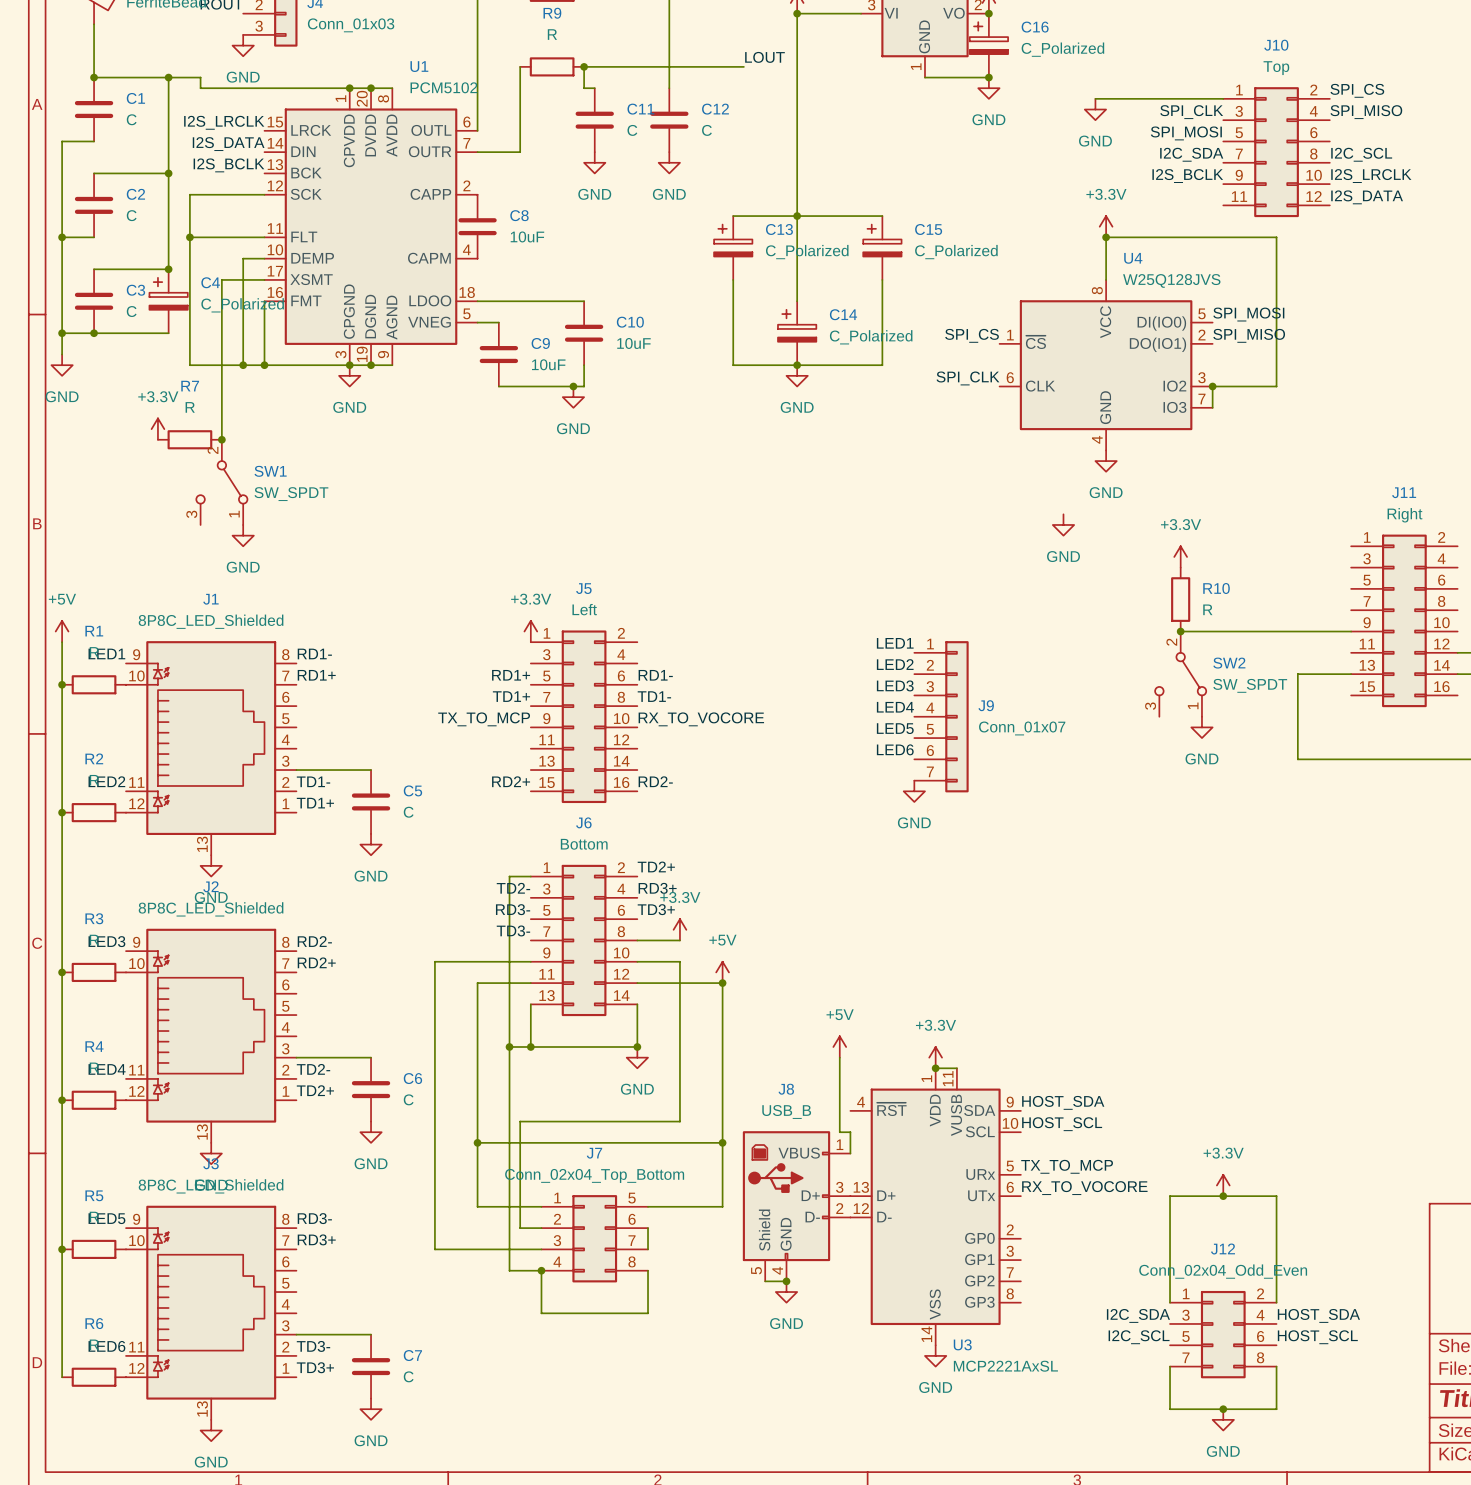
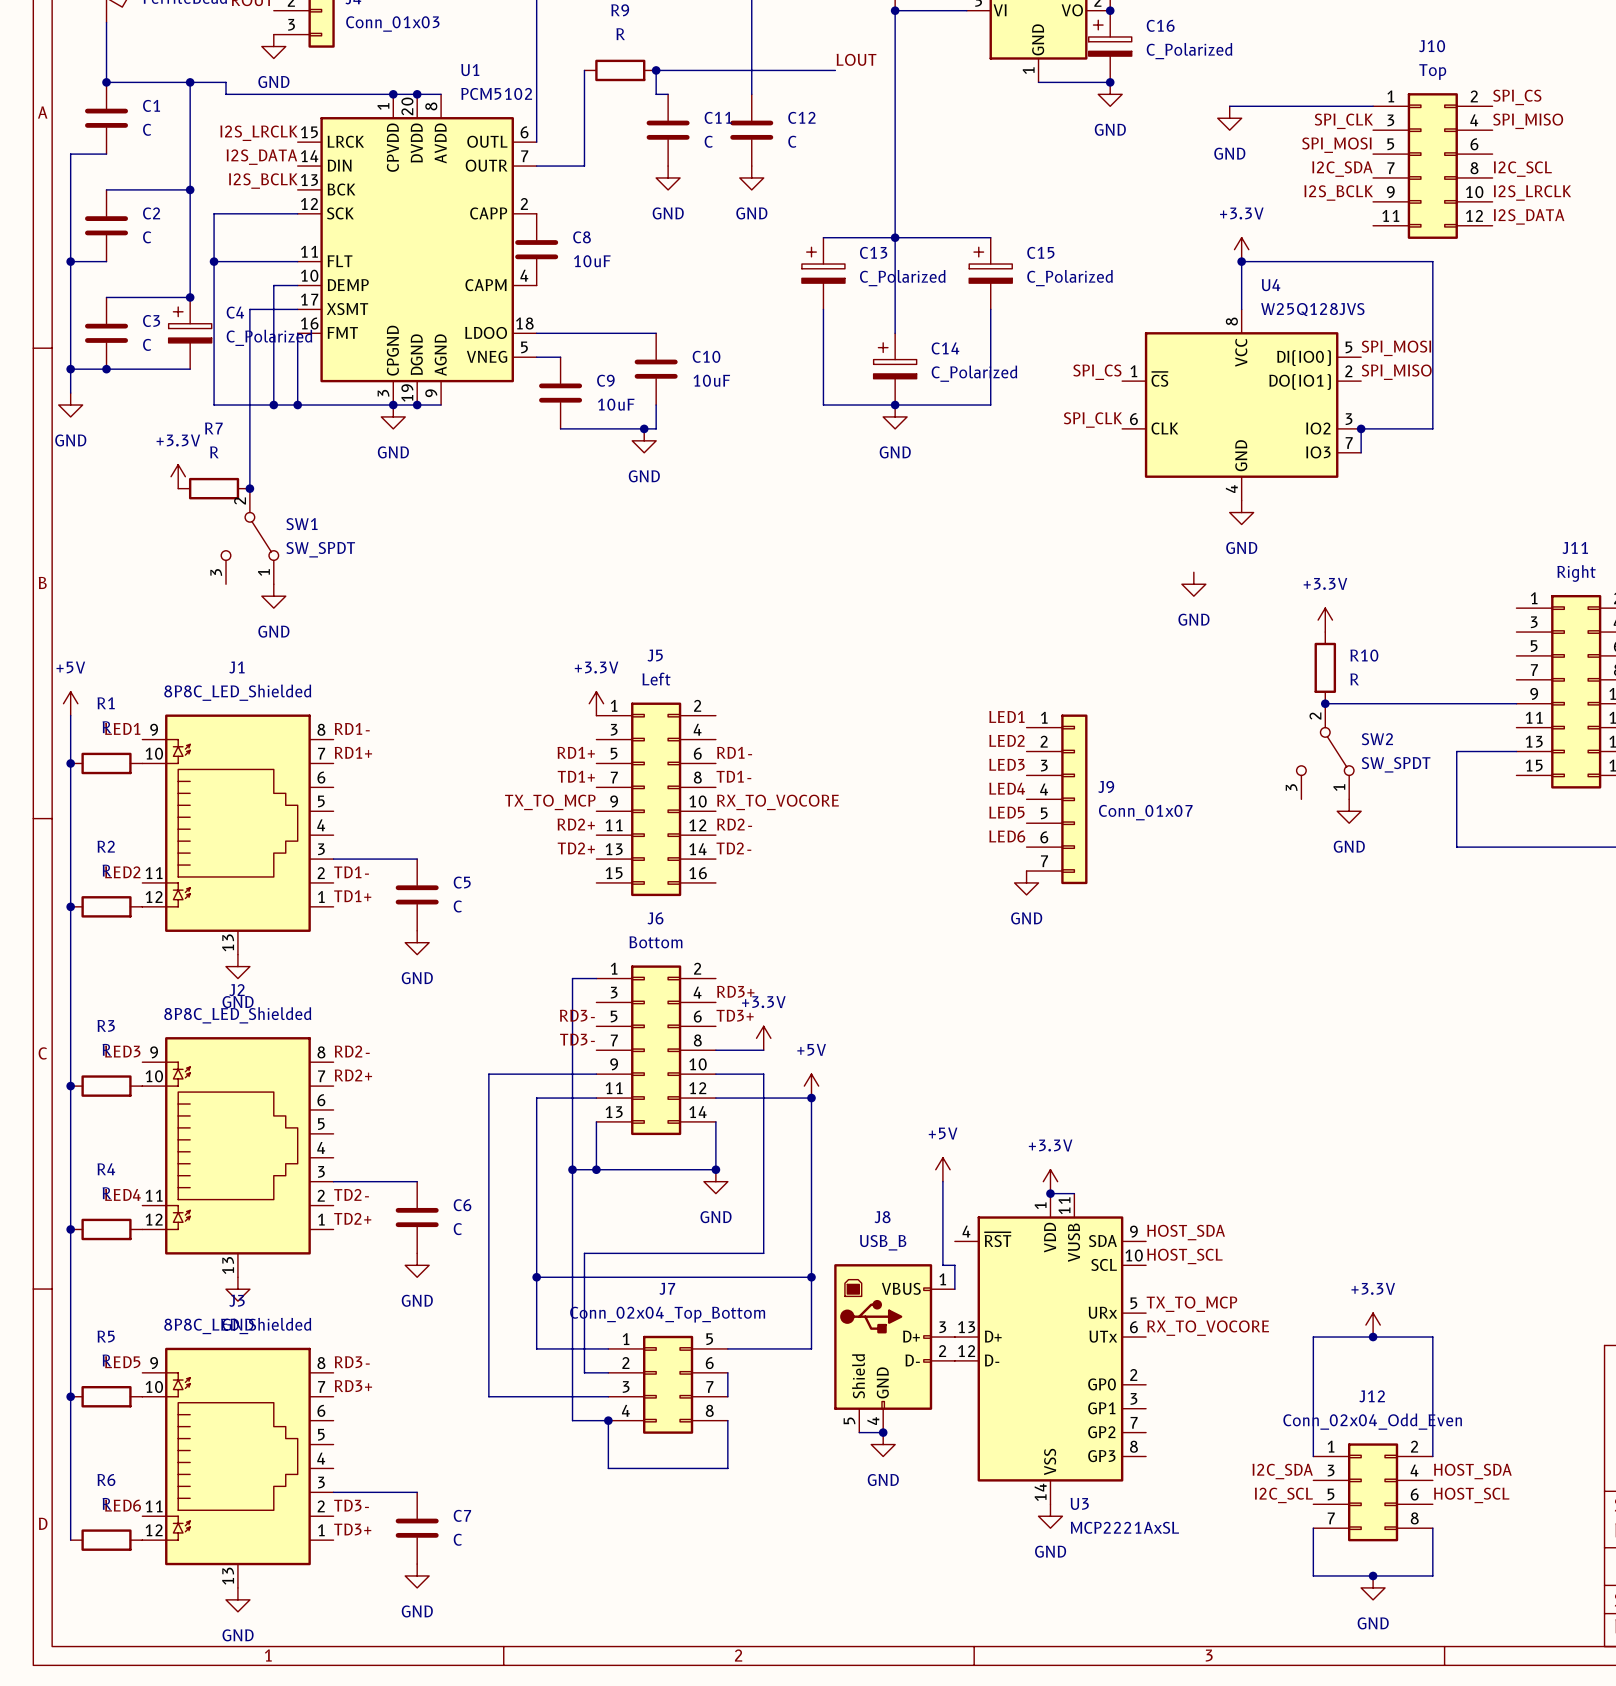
label position: RD2+ (511, 781) -> RD2+ (576, 824)
label position: RD2- (655, 781) -> RD2- (734, 824)
label position: TD2+ (656, 866) -> TD2+ (576, 848)
label position: TD2- (513, 888) -> TD2- (733, 848)

